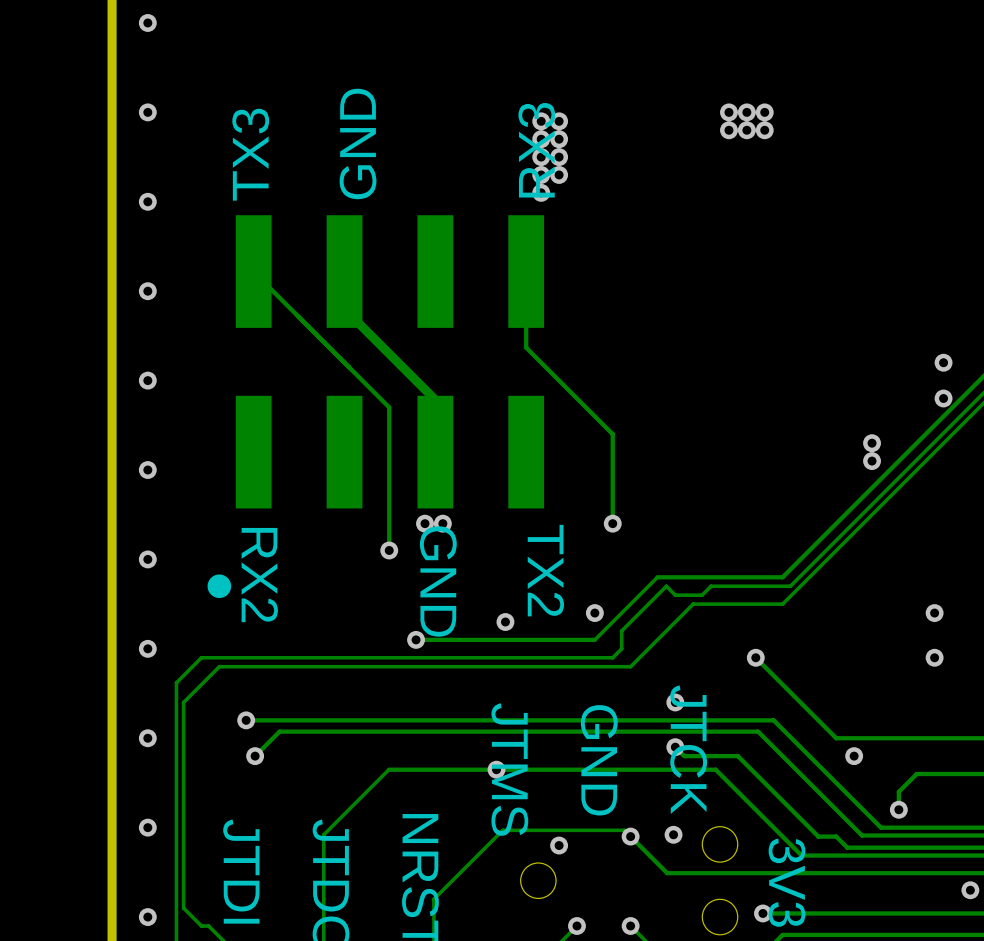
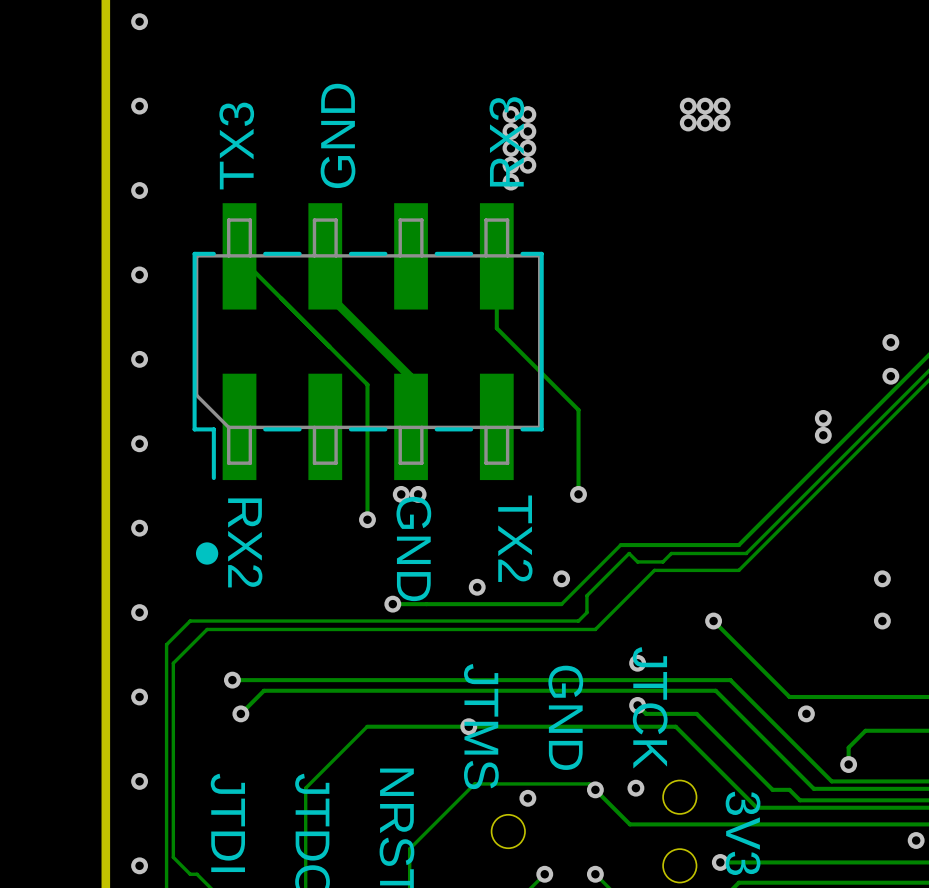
part footprint: [235, 215, 545, 509] -> [192, 203, 544, 481]

